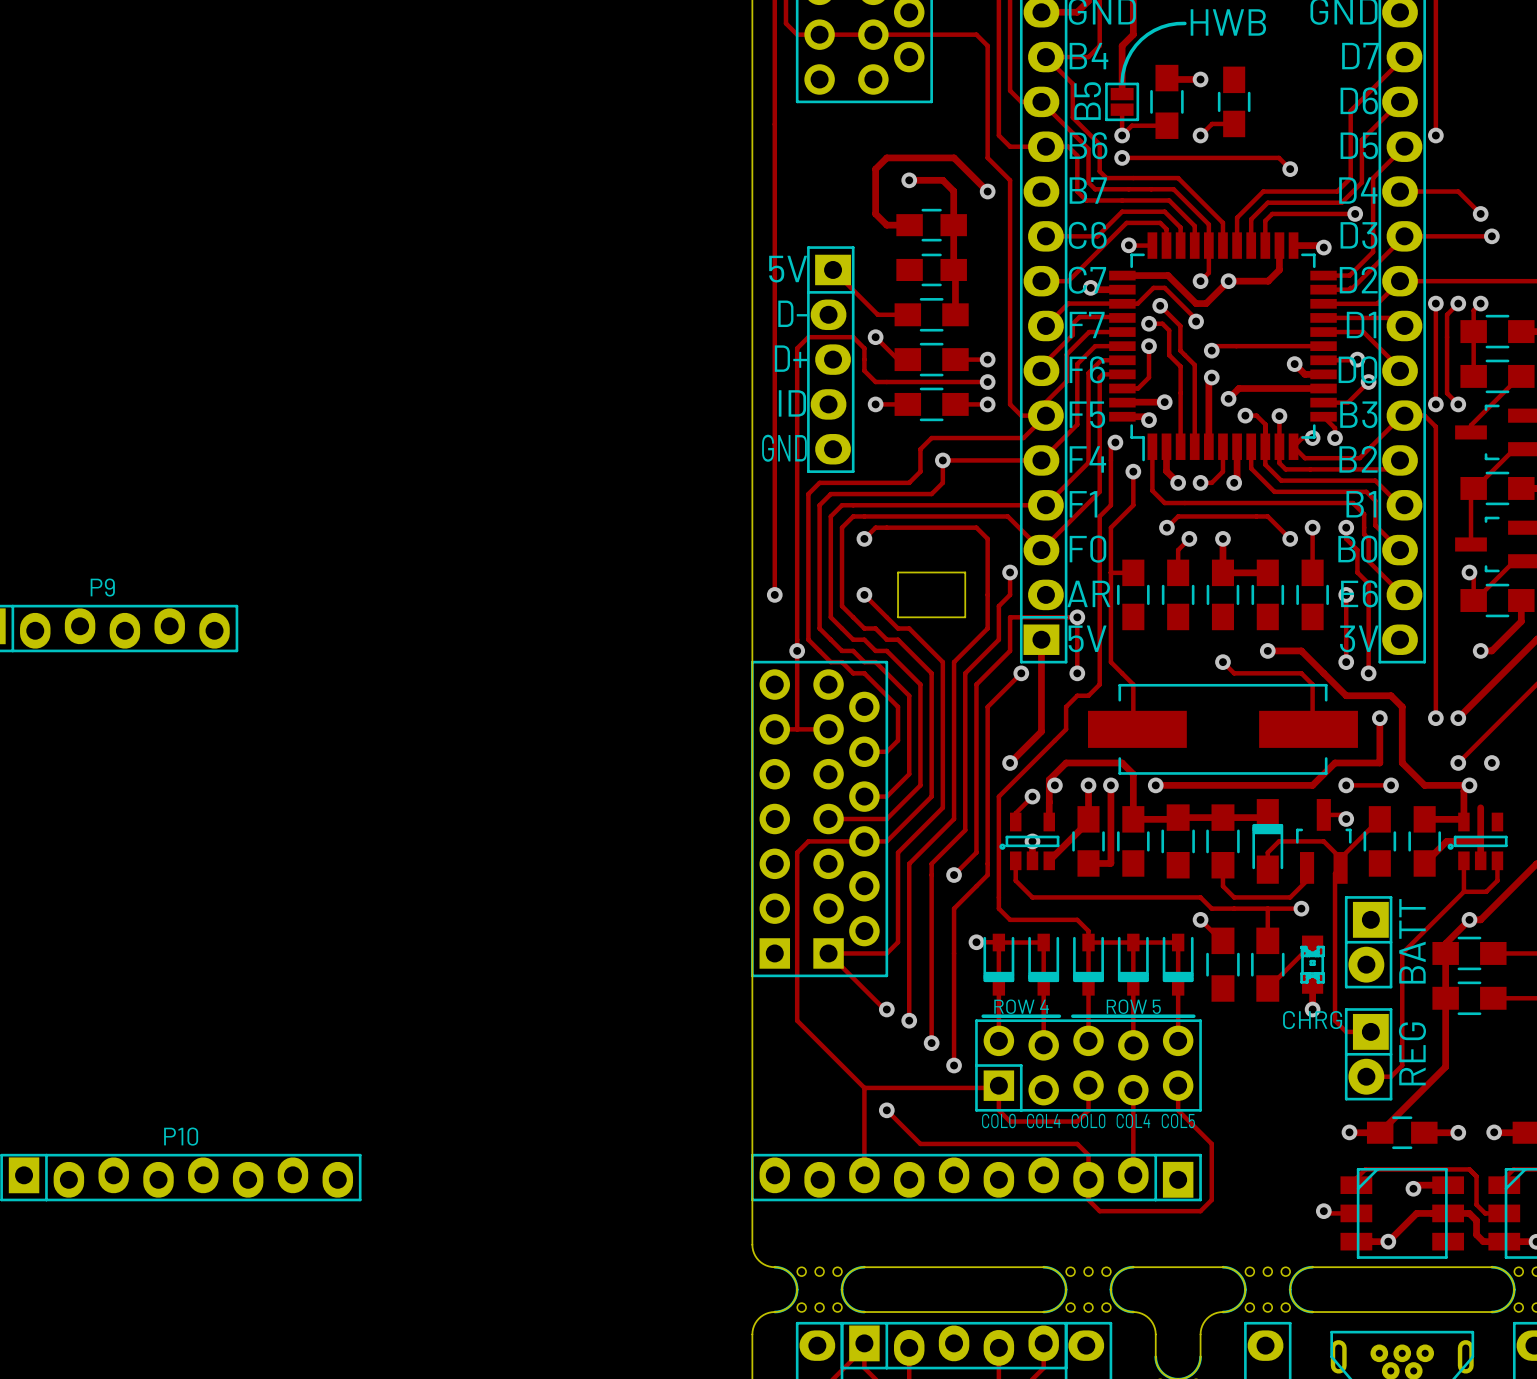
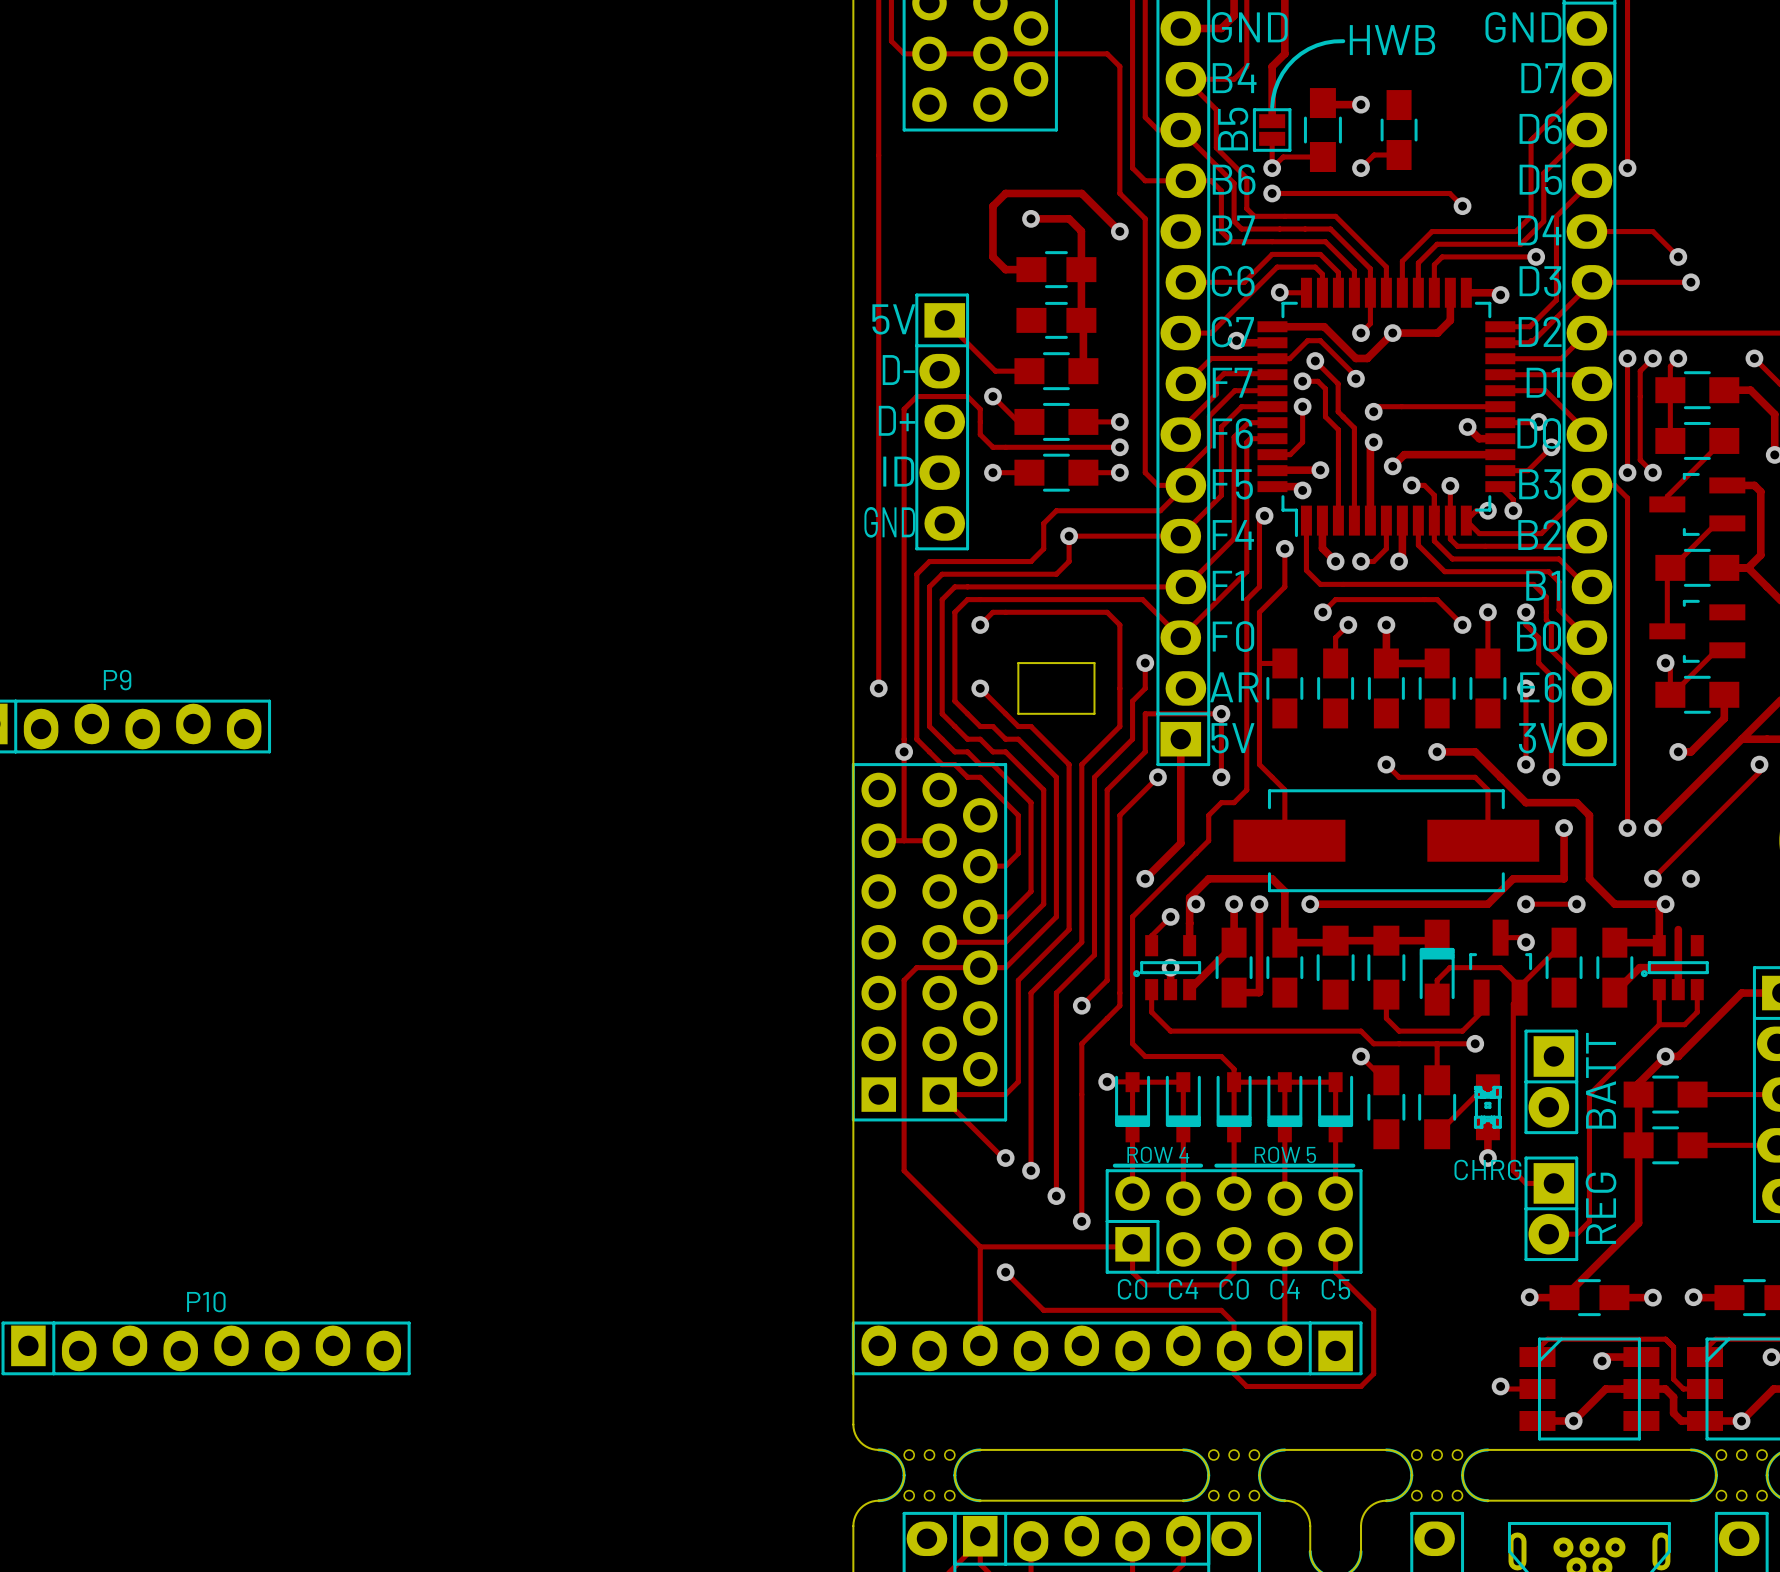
text: COL0 (998, 1121) -> C0 (1132, 1289)
text: COL4 (1043, 1121) -> C4 (1183, 1289)
text: COL0 (1088, 1121) -> C0 (1234, 1289)
text: COL4 (1133, 1121) -> C4 (1285, 1289)
text: COL5 (1178, 1121) -> C5 (1335, 1289)

